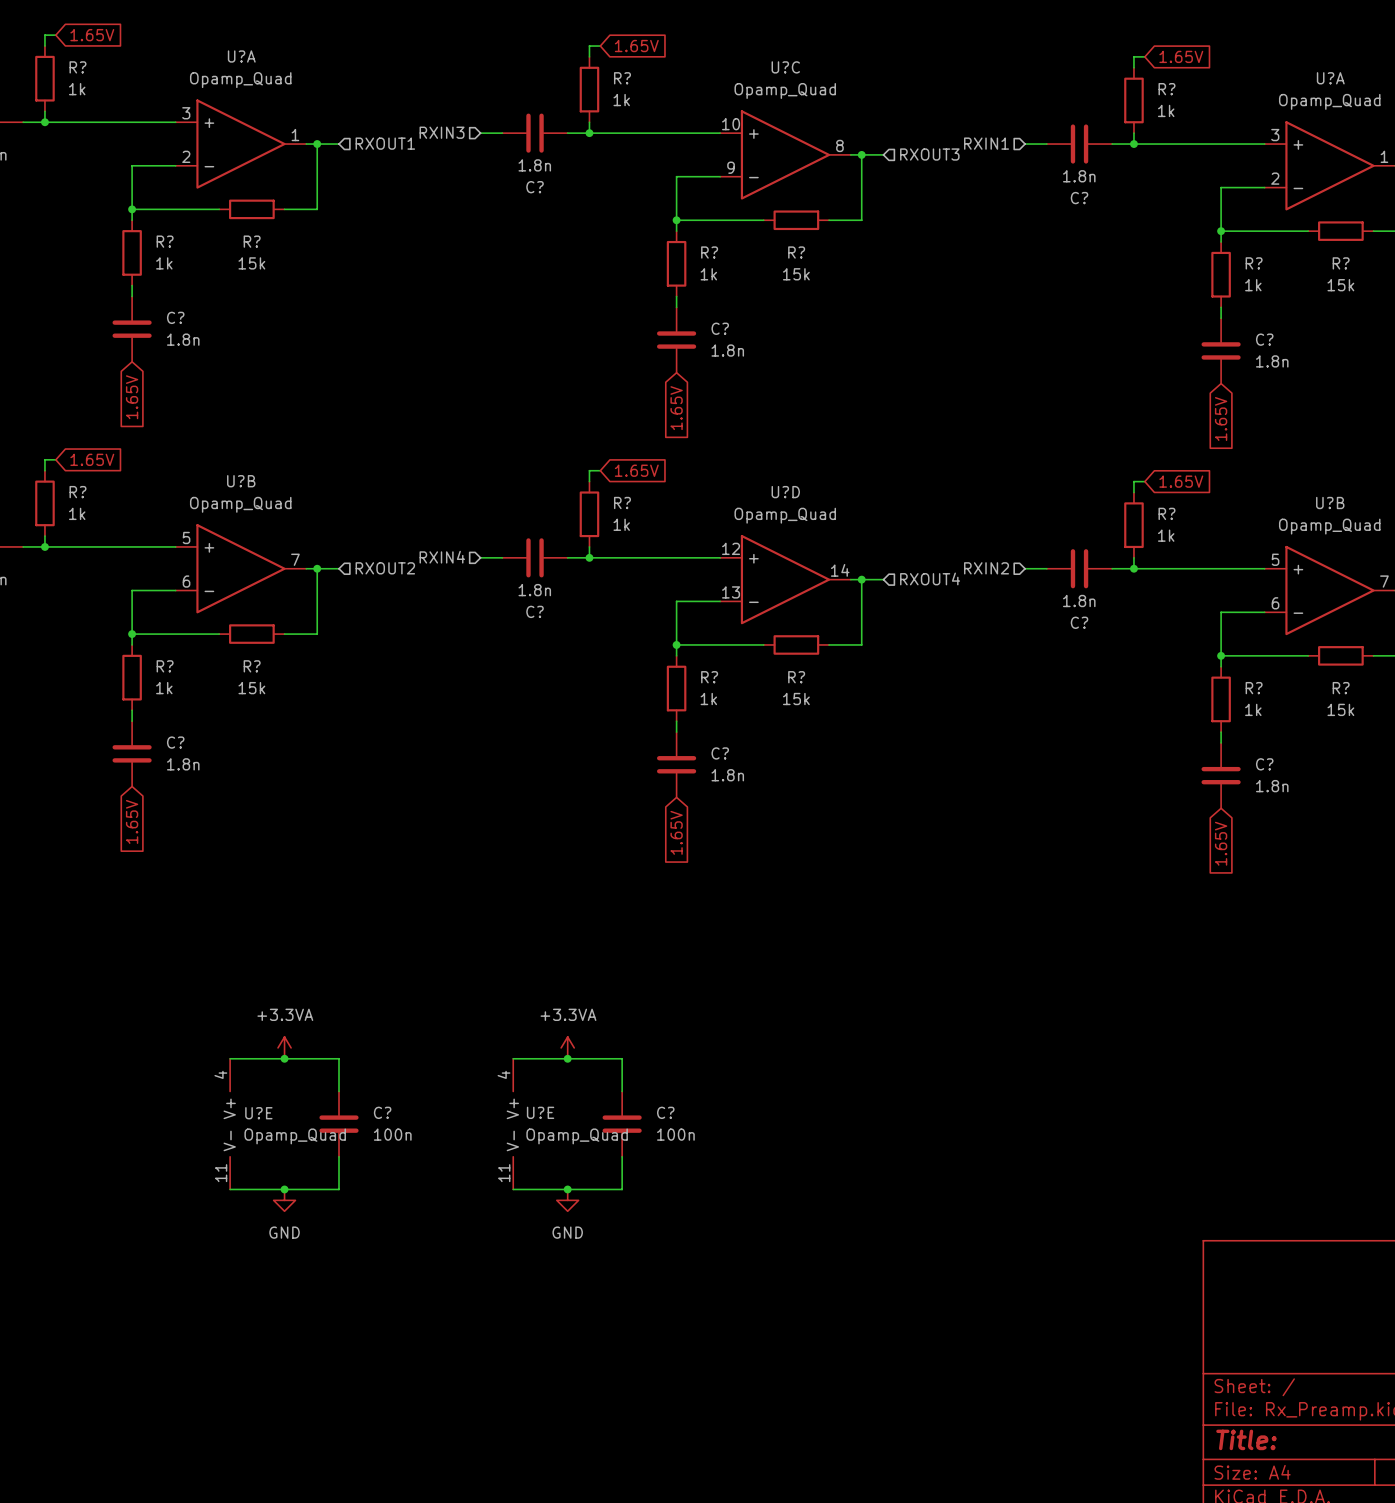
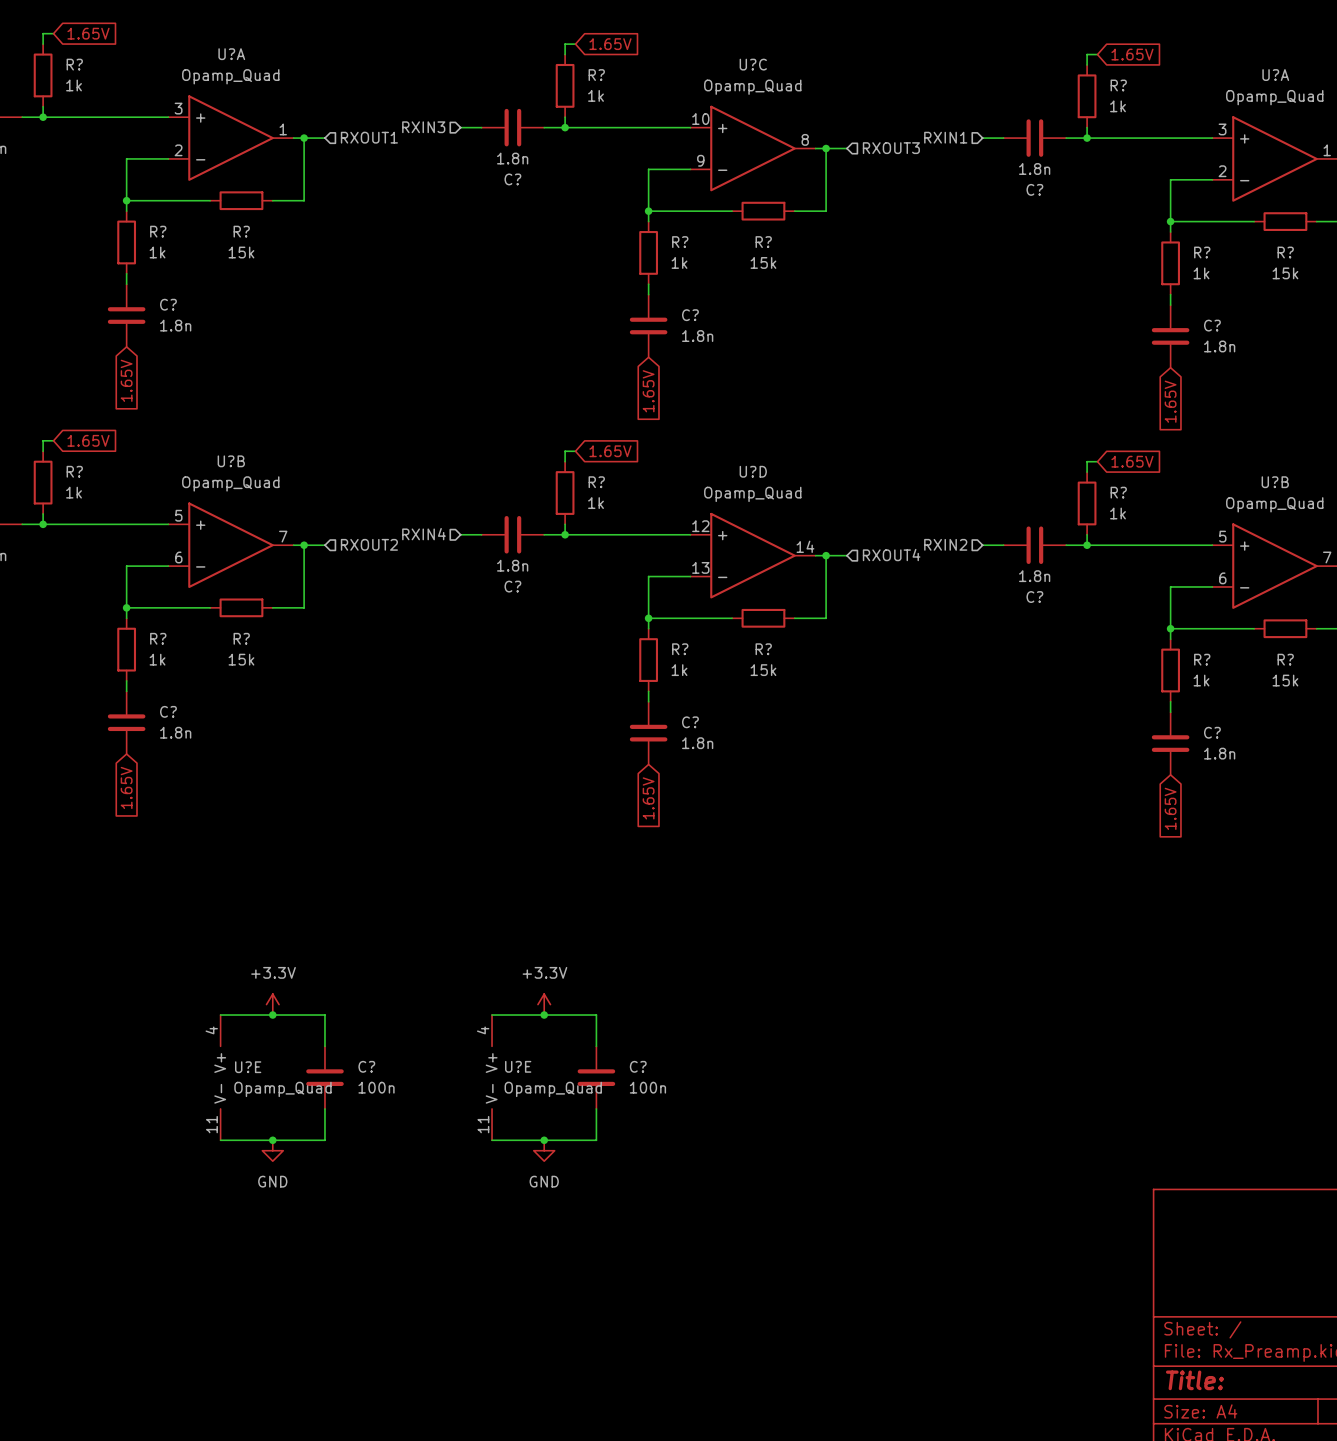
power symbol: +3.3VA (284, 1047) -> +3.3V (272, 1004)
power symbol: +3.3VA (567, 1047) -> +3.3V (544, 1004)

